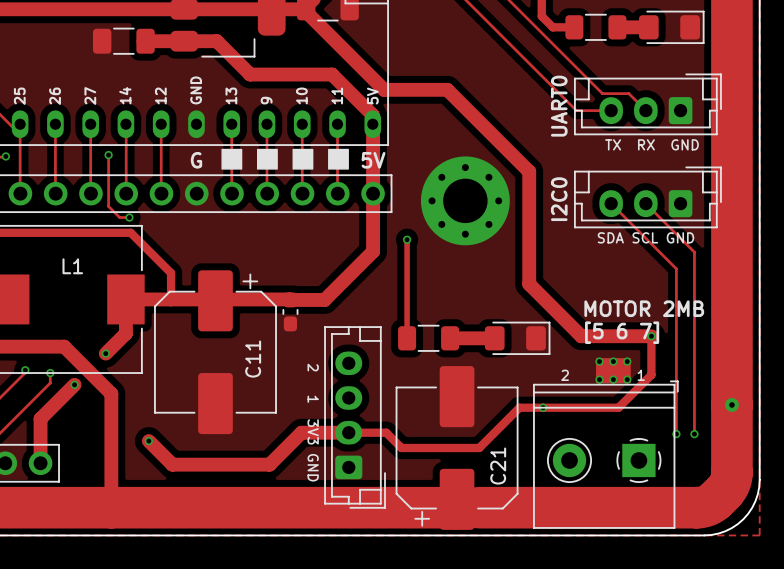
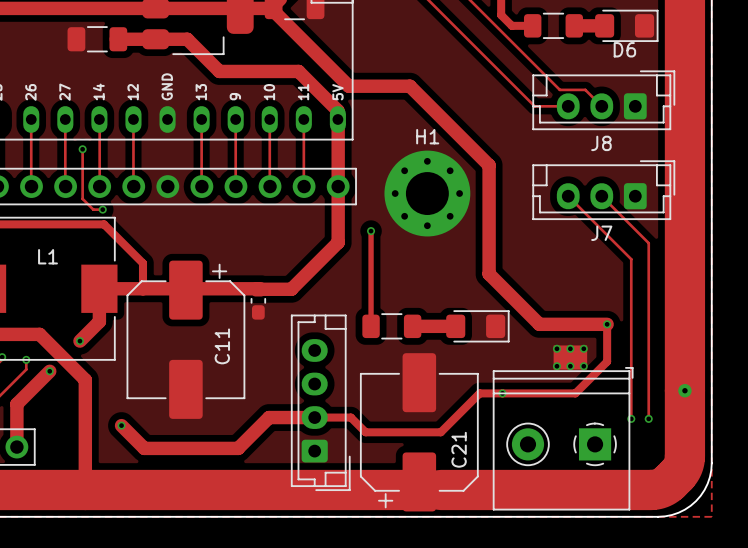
D6 name: none -> D6 (624, 49)
J8 value: UART0 (559, 106) -> none
H1 name: none -> H1 (427, 136)
text: TX RX GND (651, 144) -> none
drawing: [221, 148, 349, 170] -> none
J8 name: none -> J8 (601, 143)
text: G (196, 160) -> none
text: 5V (373, 160) -> none
J7 value: I2C0 (559, 199) -> none
text: SDA SCL GND (645, 237) -> none
J7 name: none -> J7 (601, 233)
text: MOTOR 2MB (644, 308) -> none
text: [5 6 7] (622, 332) -> none
text: 2 1 (603, 375) -> none
text: 2 1 3V3 GND (313, 422) -> none

